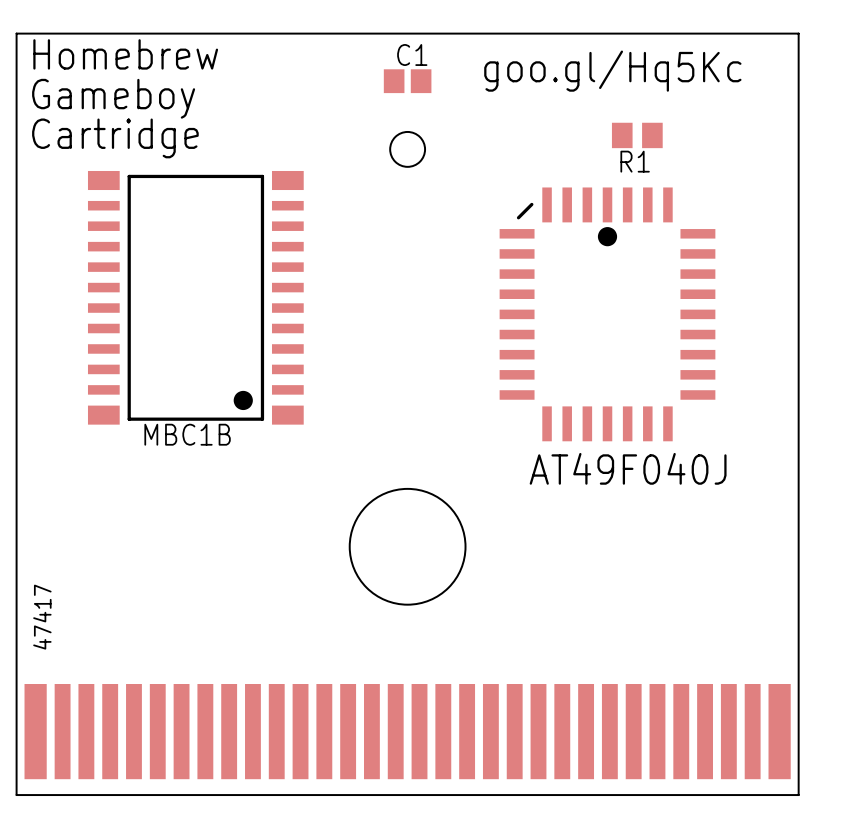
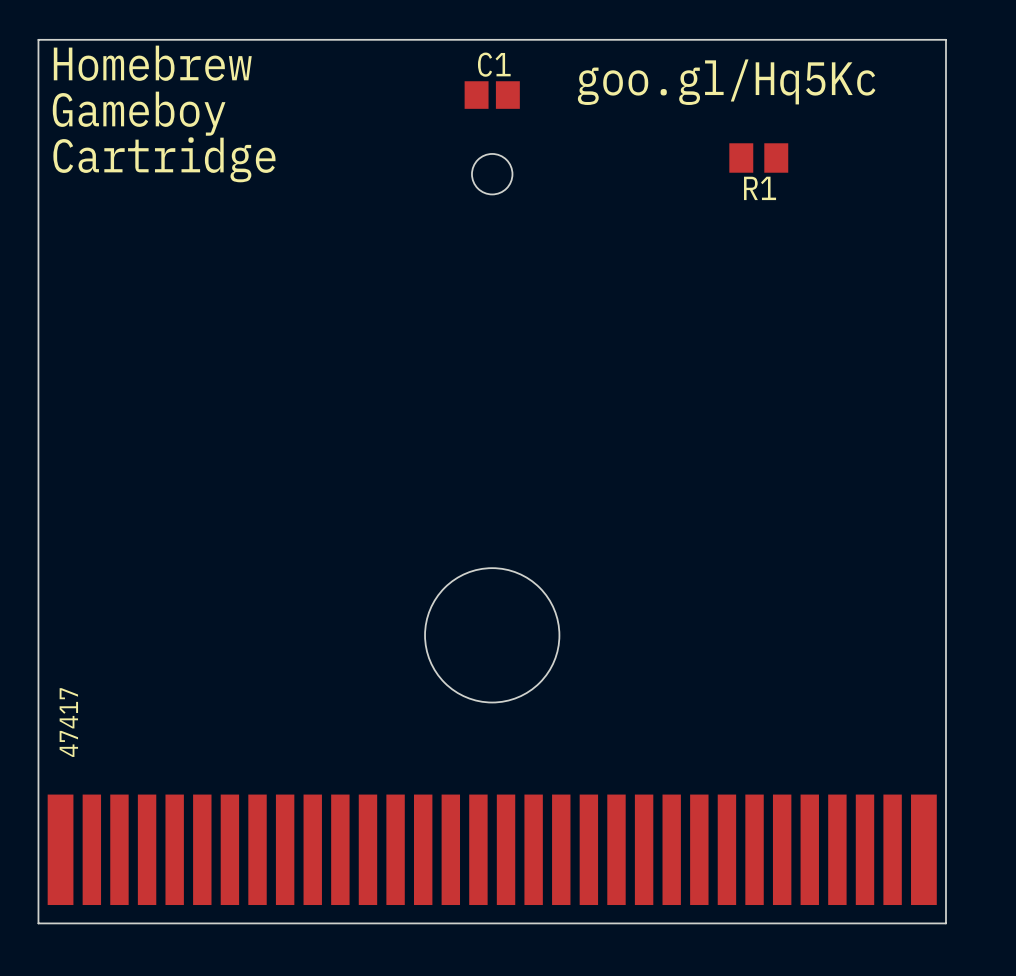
part: MBC1B (195, 297) -> none
part: AT49F040J (607, 314) -> none

